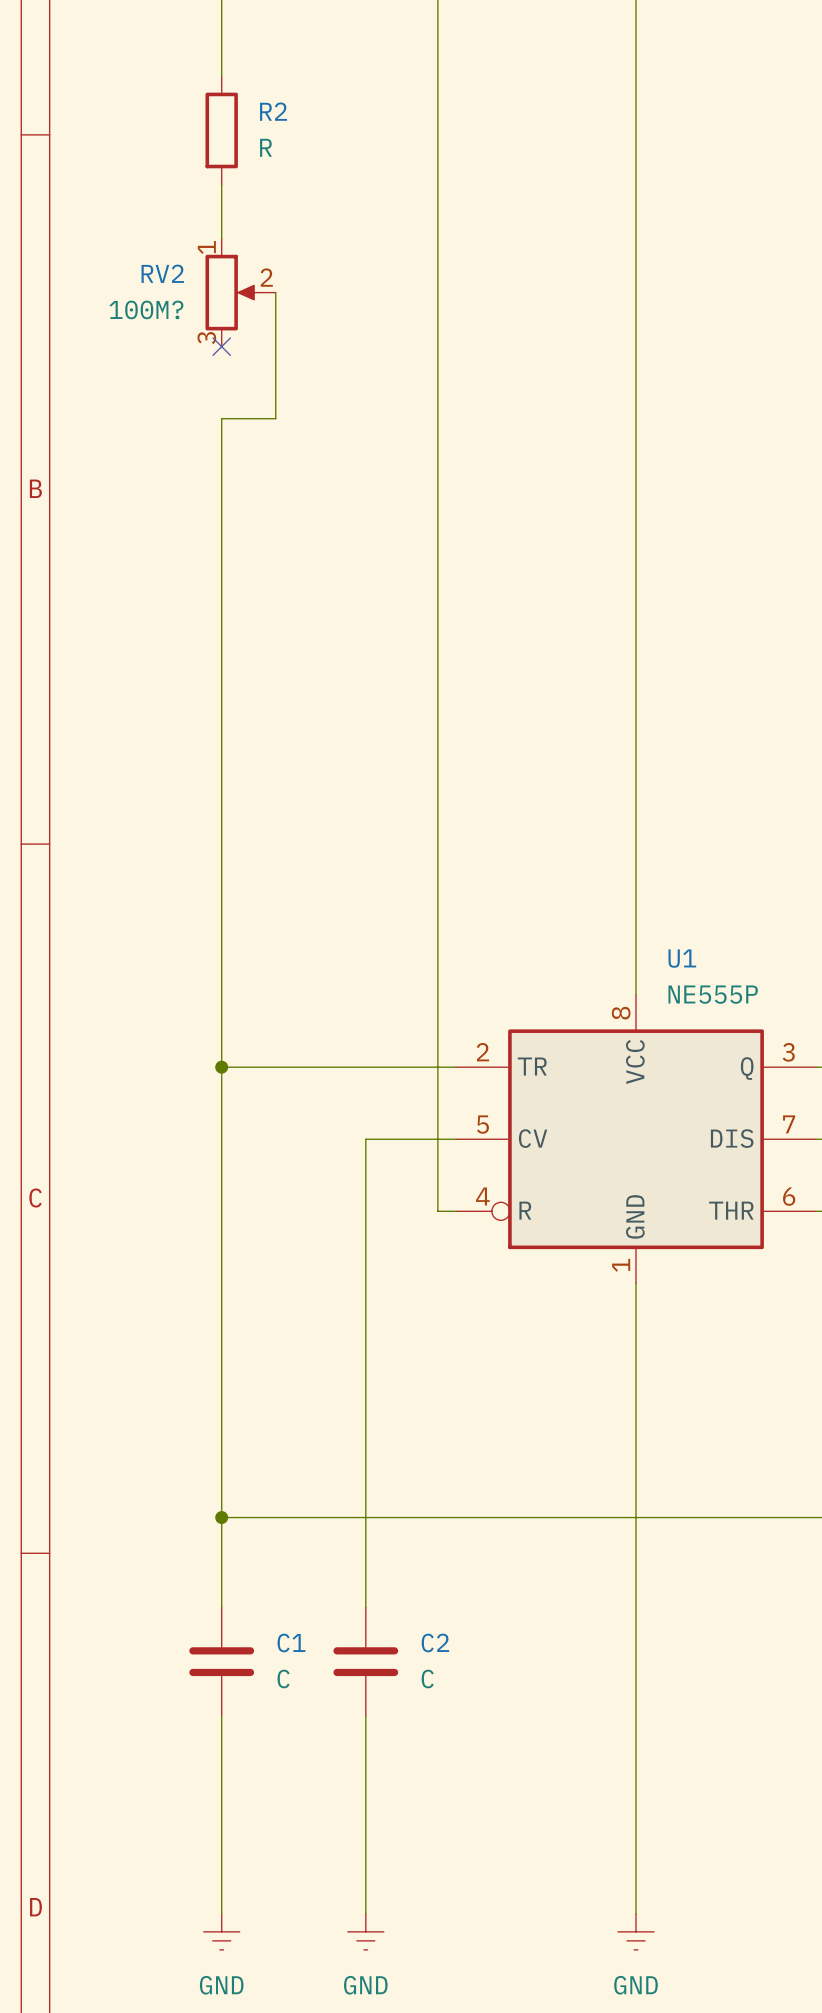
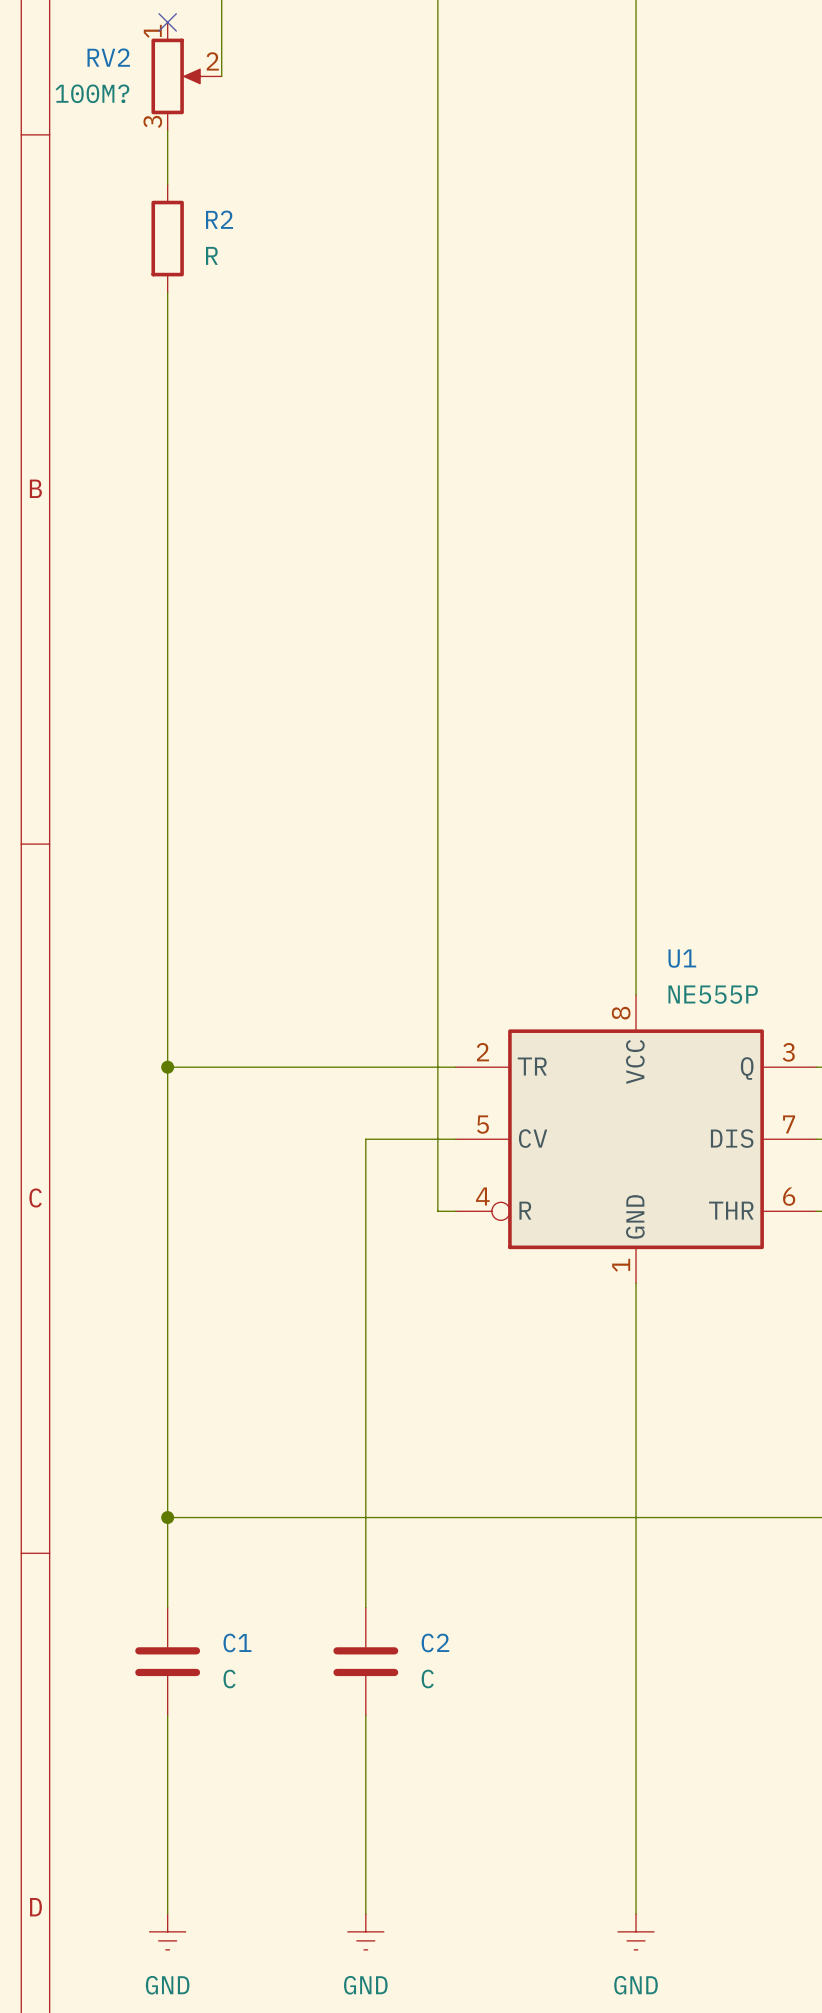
no-connect mark: none -> (167, 22)
R2 position: (221, 130) -> (167, 238)
wire: (221, 184) (221, 238) -> (167, 130) (167, 184)
wire: none -> (167, 292) (167, 1607)
RV2 position: (240, 292) -> (186, 76)
wire: (275, 292) (275, 418) (221, 418) (221, 1607) -> none
no-connect mark: (221, 346) -> none
wire: none -> (167, 1067) (221, 1067)
junction position: (221, 1067) -> (167, 1067)
wire: none -> (167, 1517) (221, 1517)
junction position: (221, 1517) -> (167, 1517)
C1 position: (221, 1661) -> (167, 1661)
wire: (221, 1715) (221, 1913) -> (167, 1715) (167, 1913)
power symbol position: GND (221, 1931) -> GND (167, 1931)

